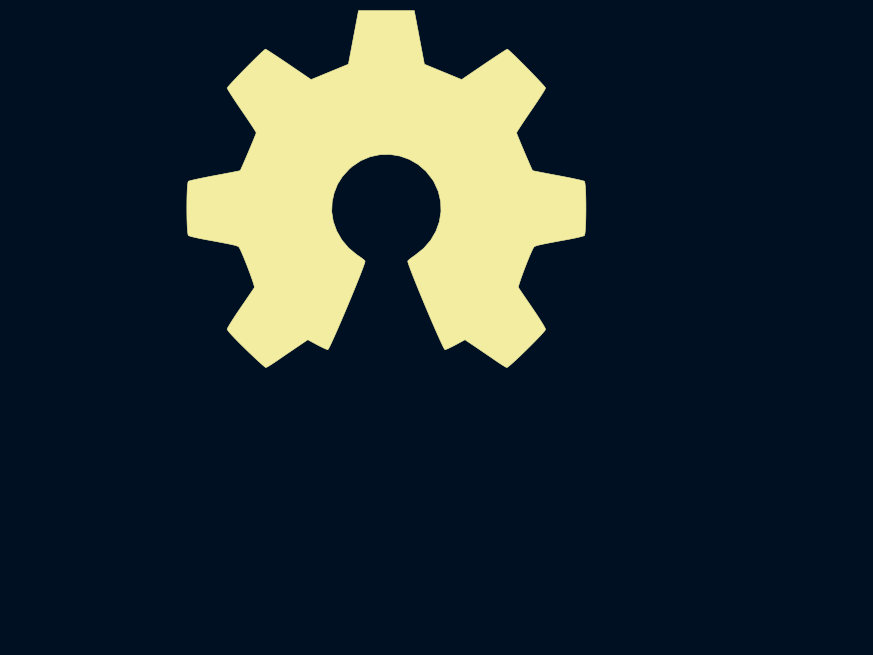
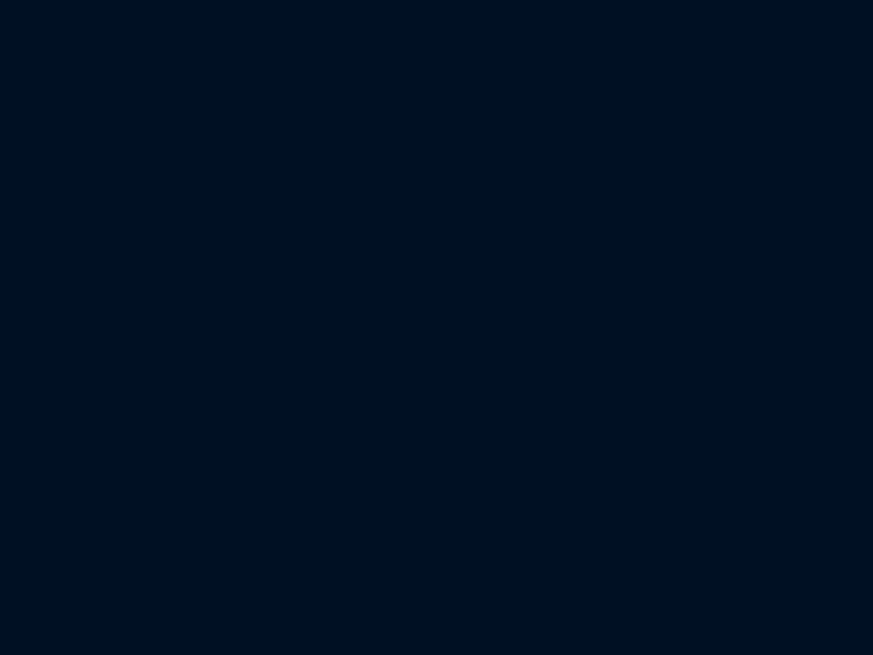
drawing: [186, 10, 587, 368] -> none

